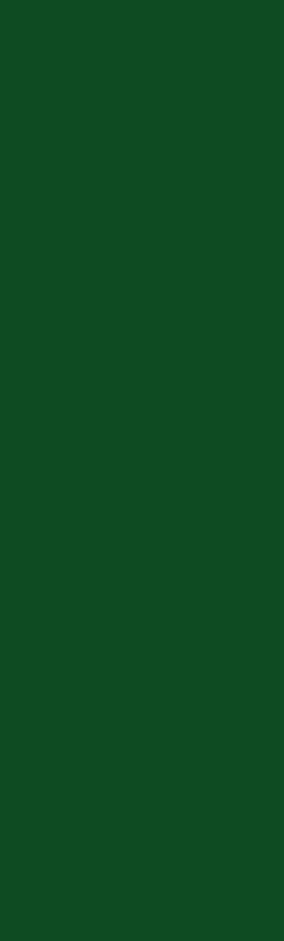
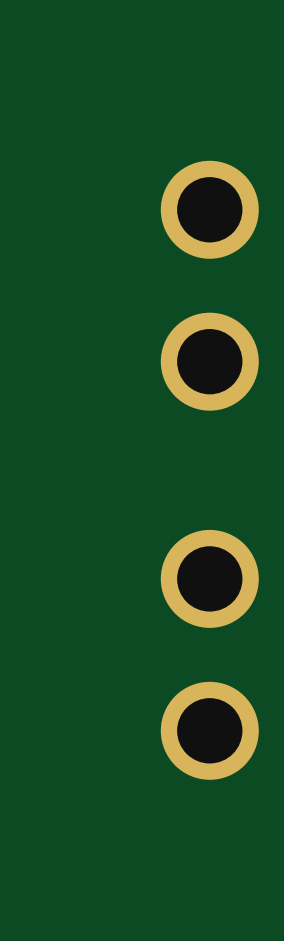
part: none -> (209, 209)
part: none -> (209, 361)
part: none -> (209, 578)
part: none -> (209, 730)

